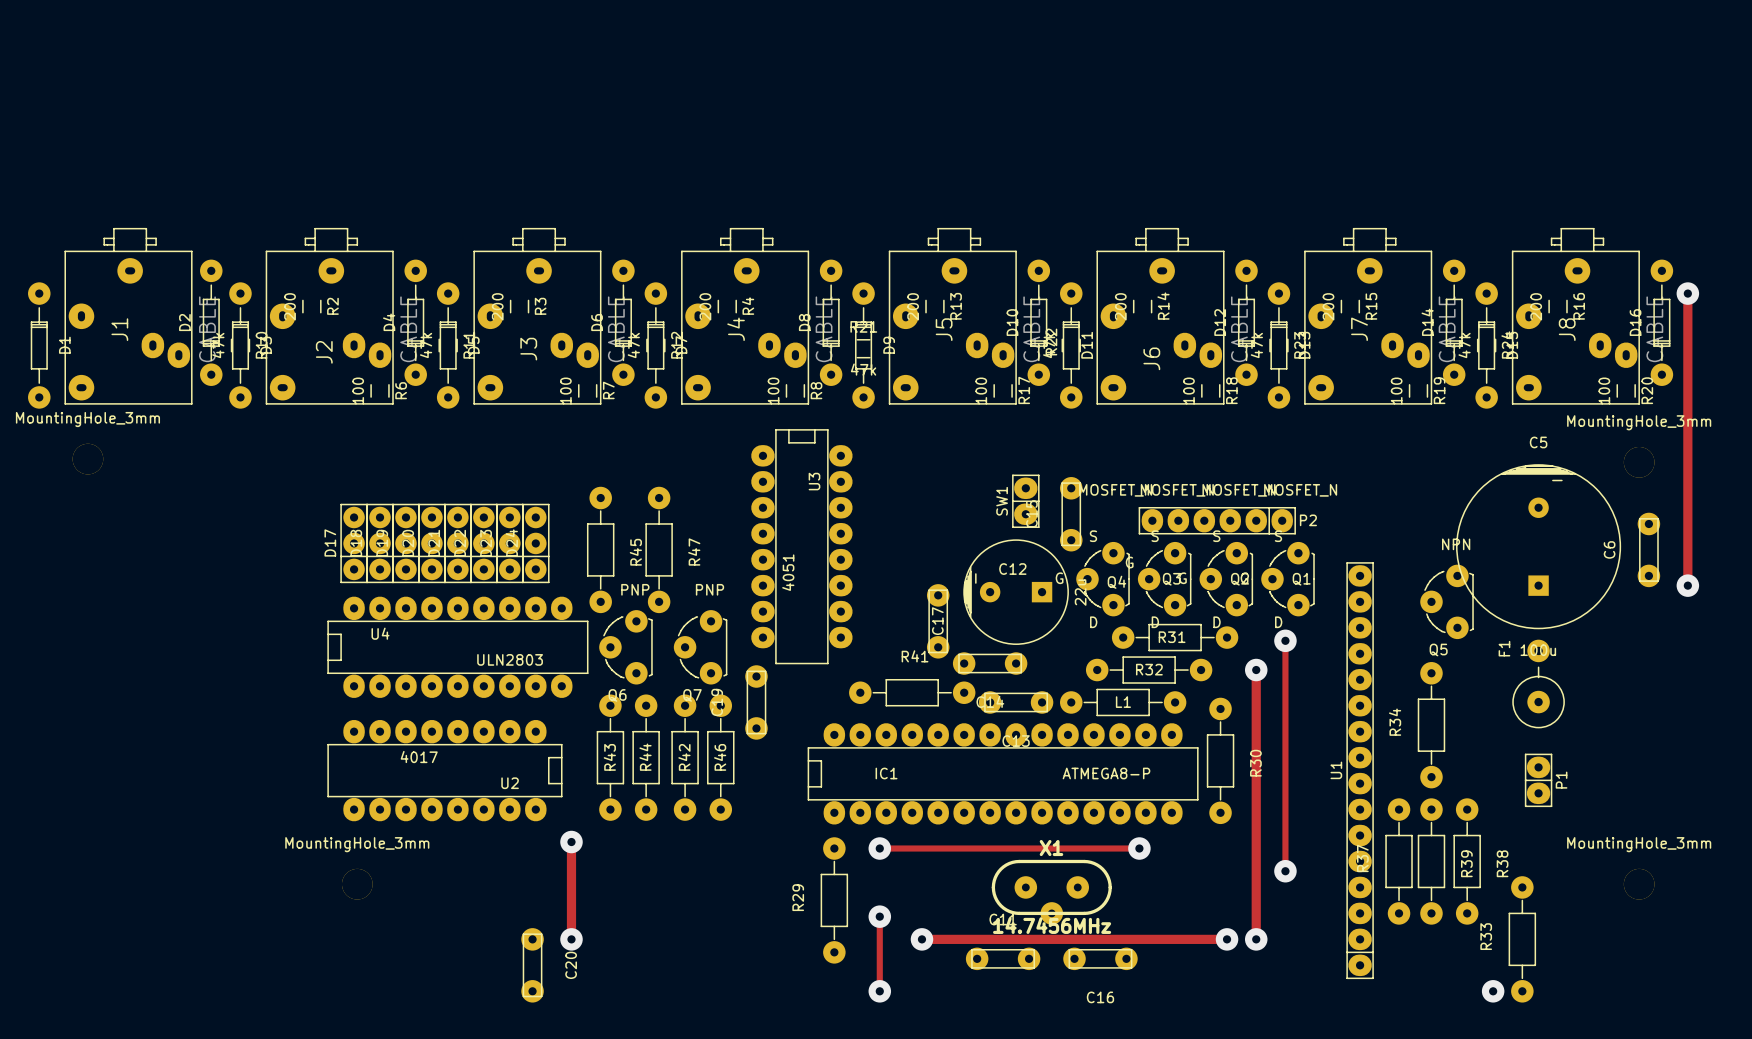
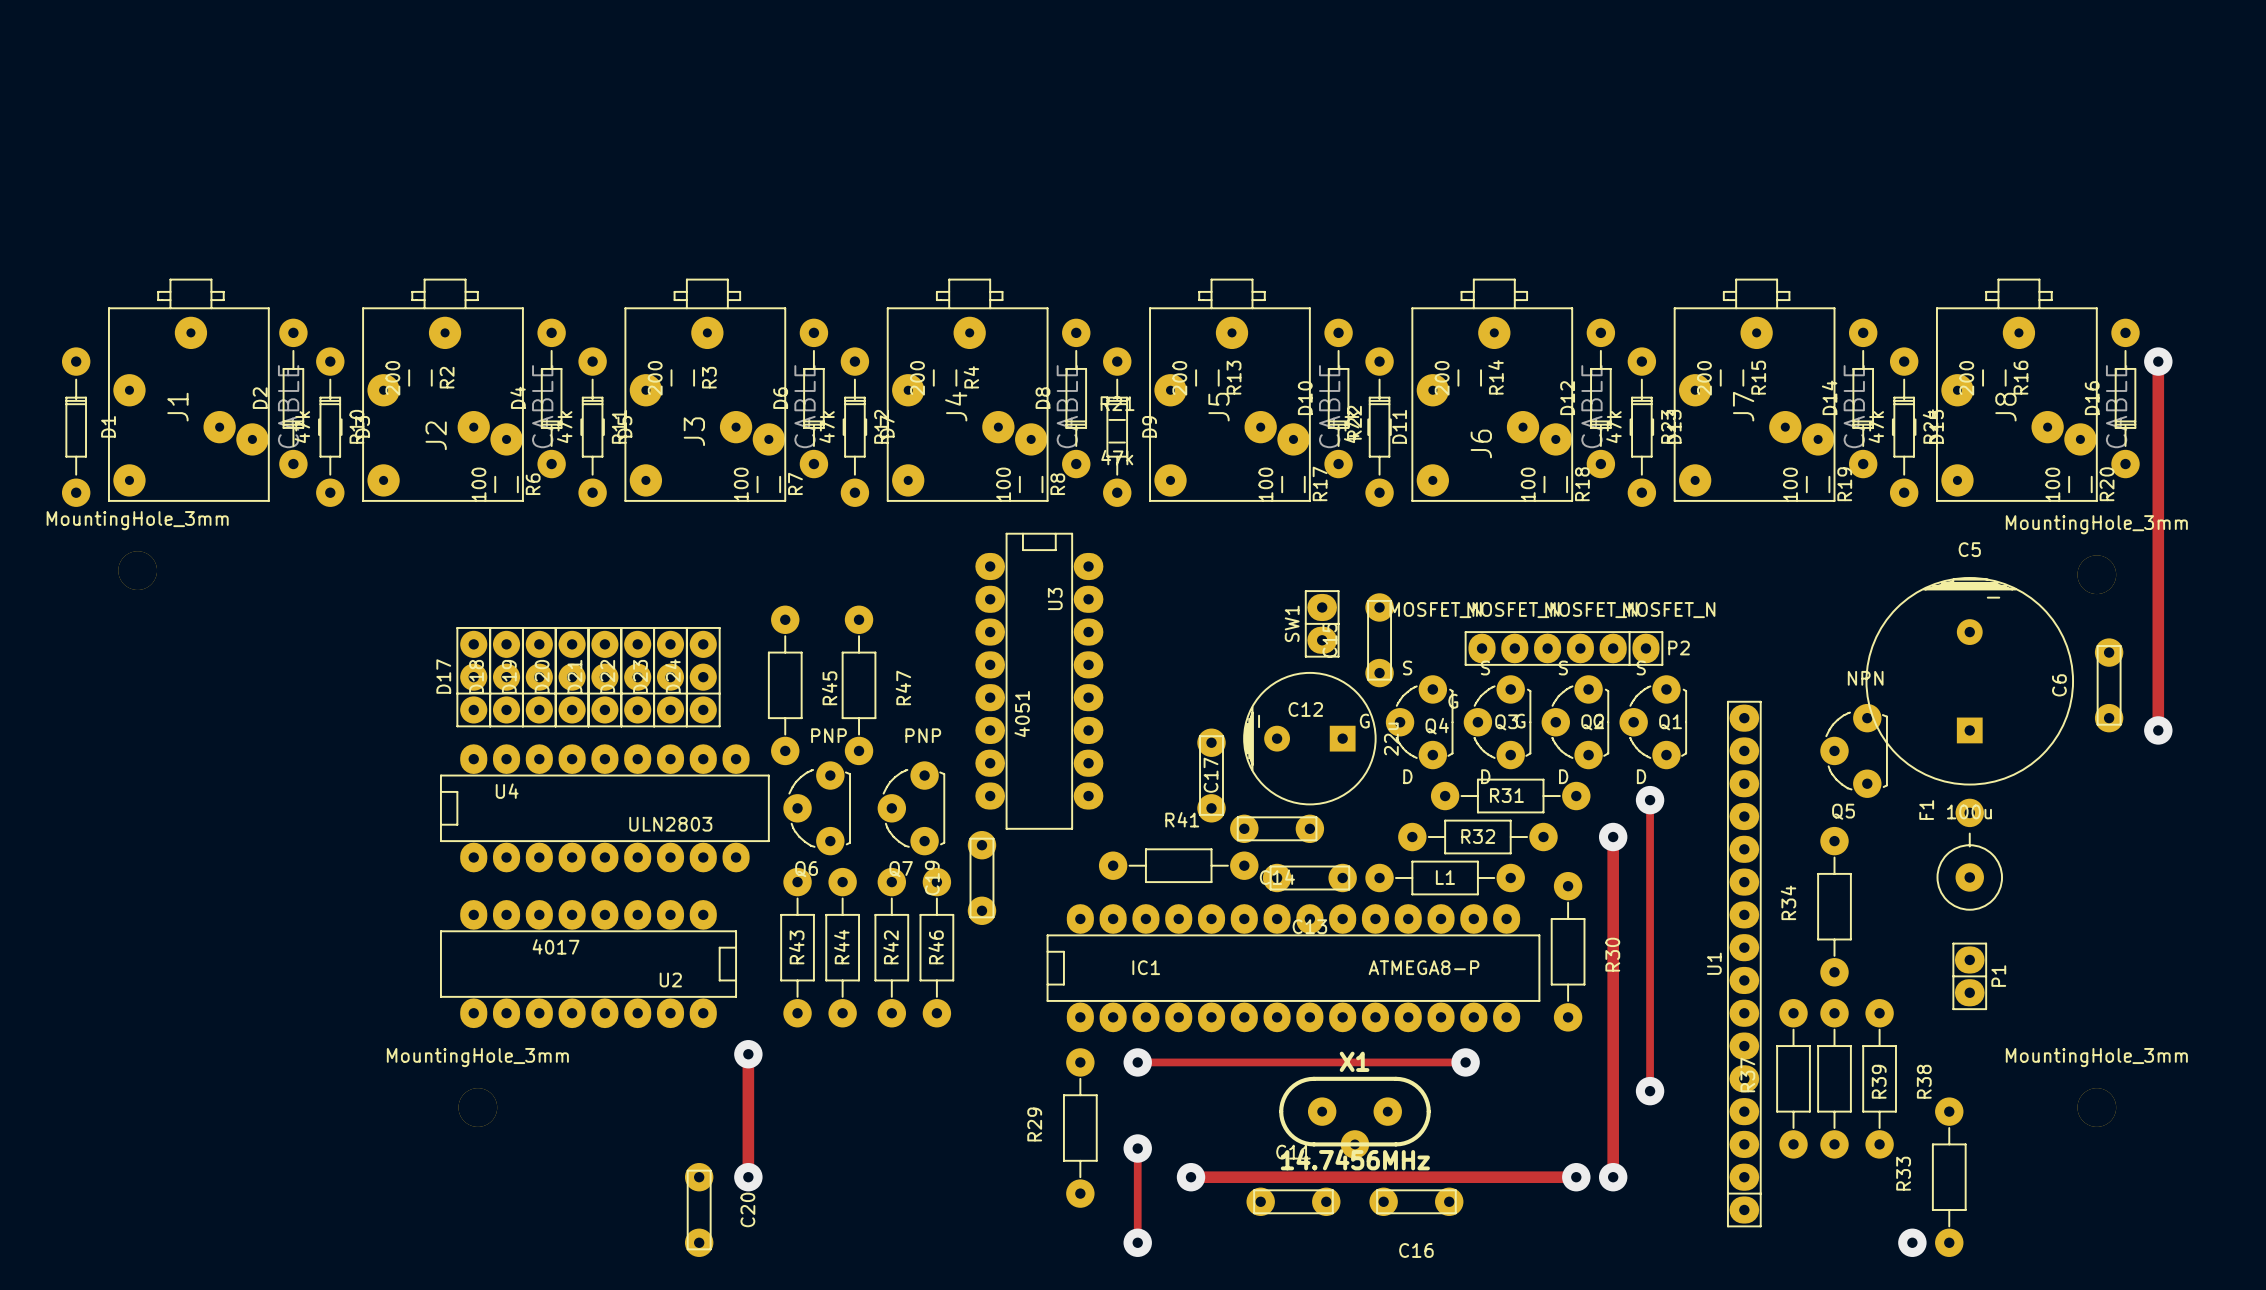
J1 footprint: [64, 227, 193, 405] -> [108, 278, 270, 502]
J2 footprint: [265, 227, 394, 405] -> [362, 278, 524, 502]
J3 footprint: [473, 227, 602, 405] -> [624, 278, 787, 502]
J4 footprint: [681, 227, 810, 405] -> [886, 278, 1049, 502]
J5 footprint: [888, 227, 1017, 405] -> [1149, 278, 1311, 502]
J6 footprint: [1096, 227, 1225, 405] -> [1411, 278, 1574, 502]
J7 footprint: [1304, 227, 1433, 405] -> [1673, 278, 1836, 502]
J8 footprint: [1511, 227, 1640, 405] -> [1936, 278, 2098, 502]

